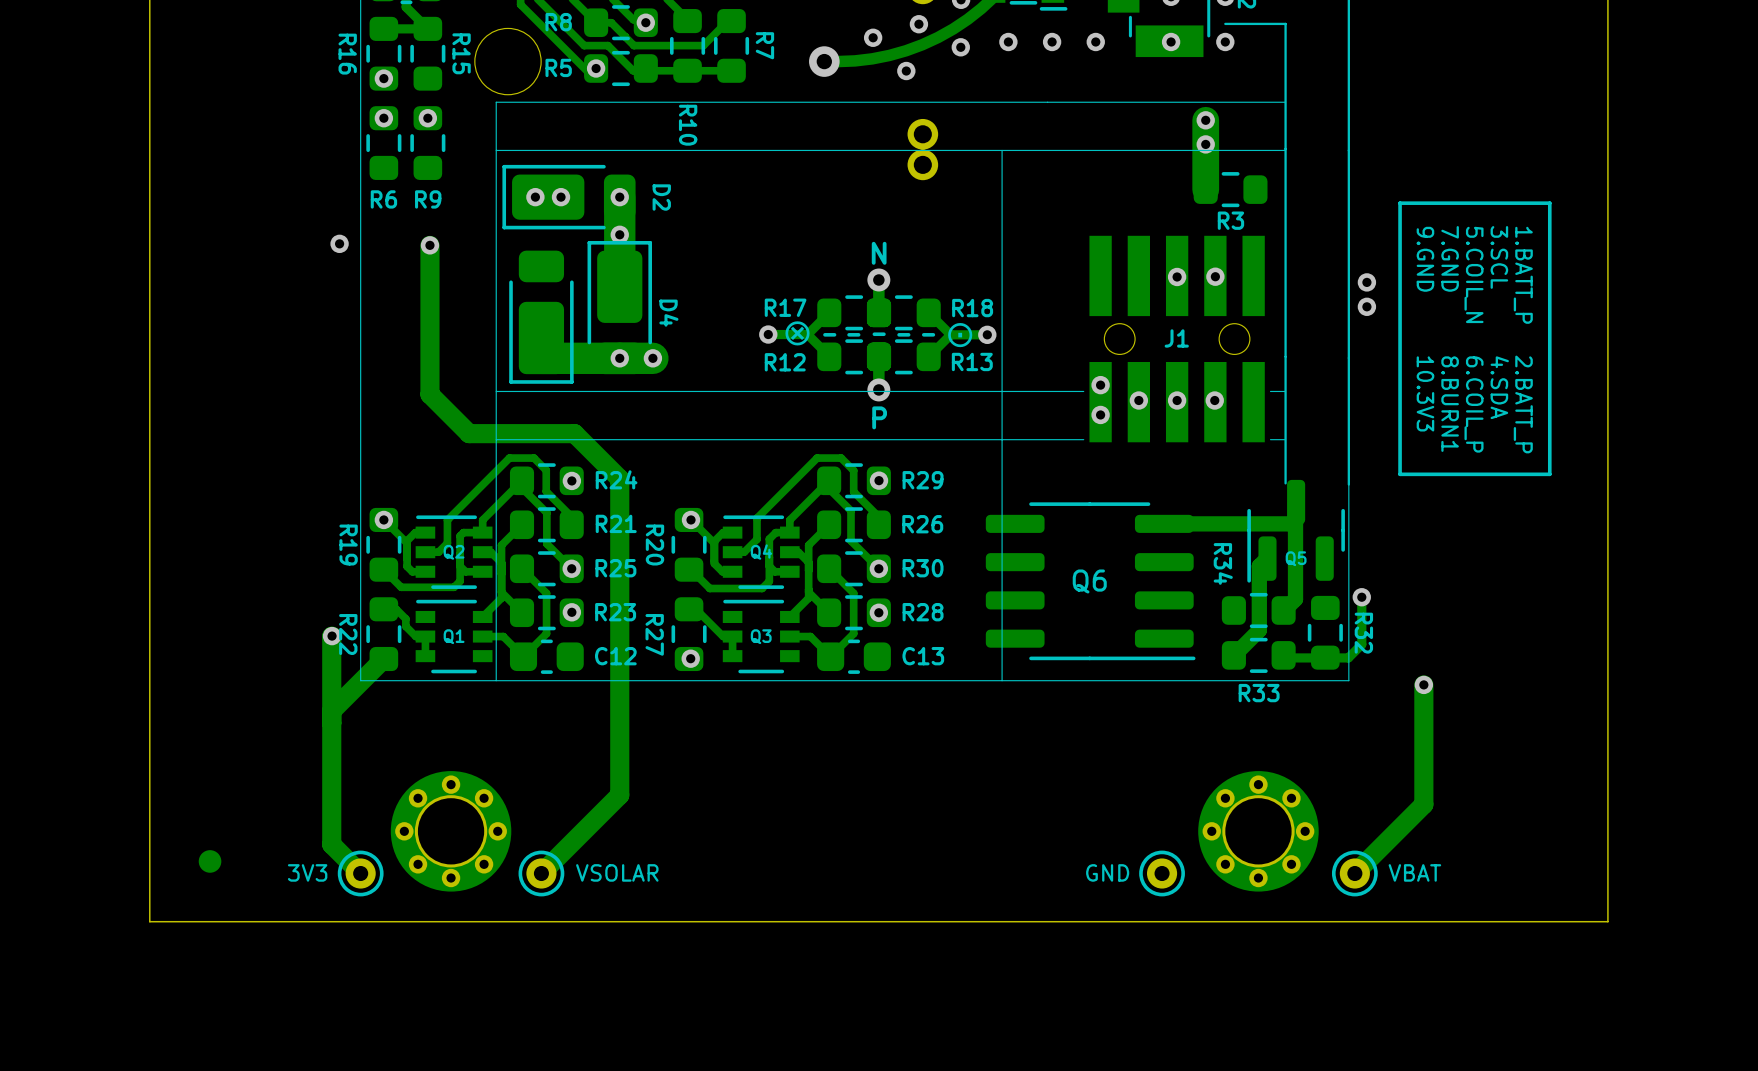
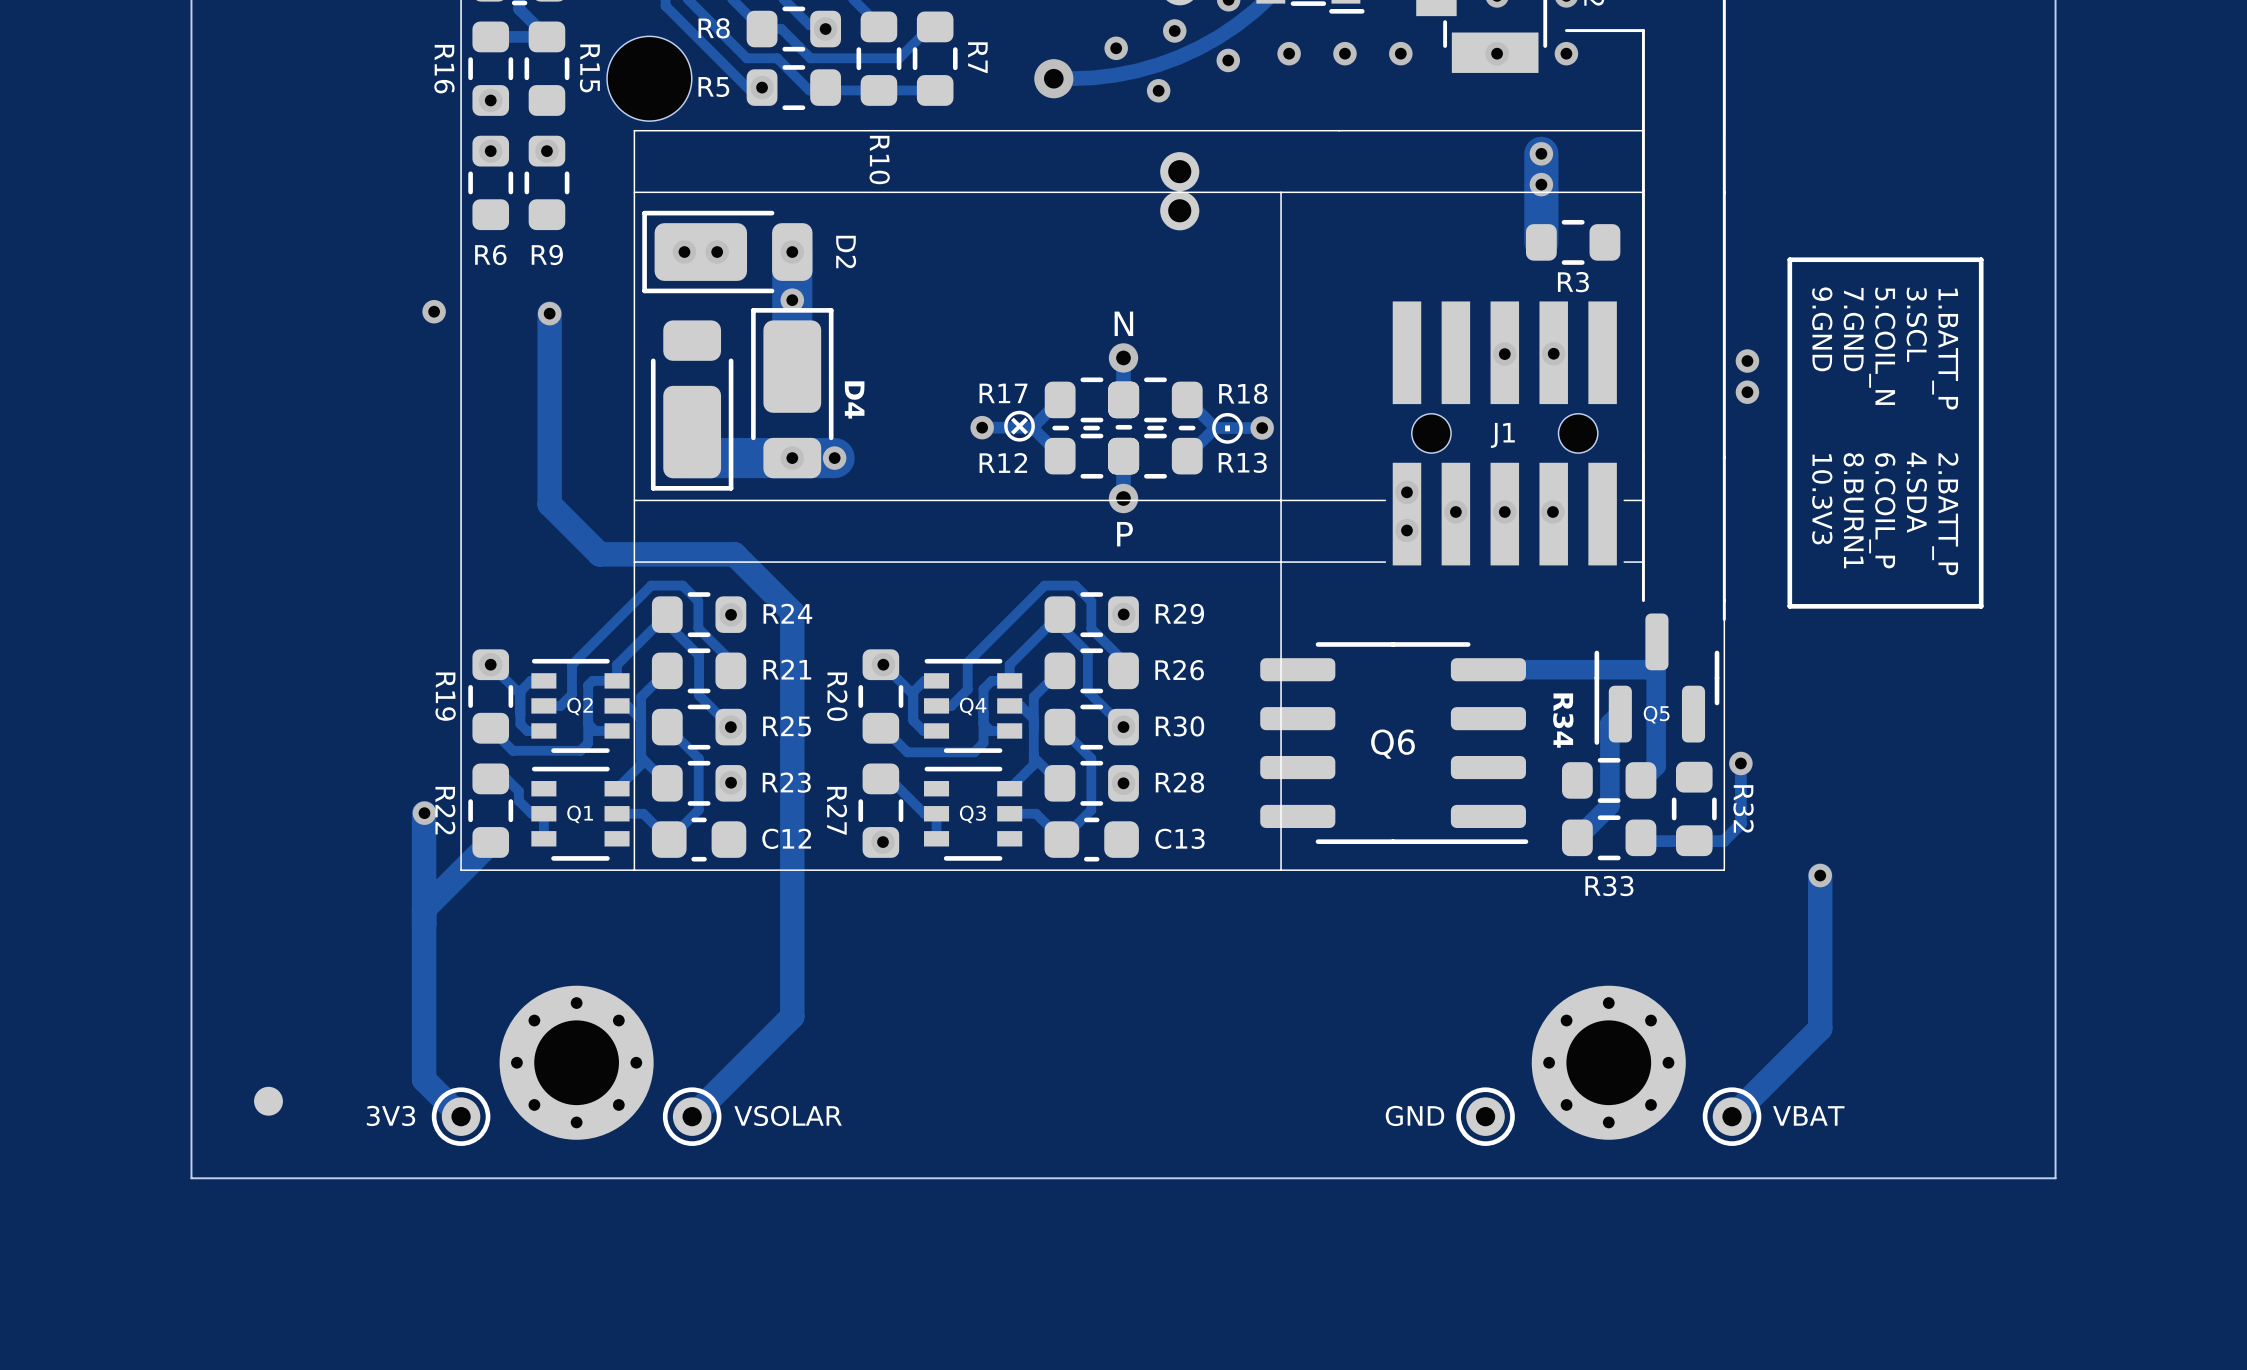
line: (1285, 469) (1285, 483) -> none

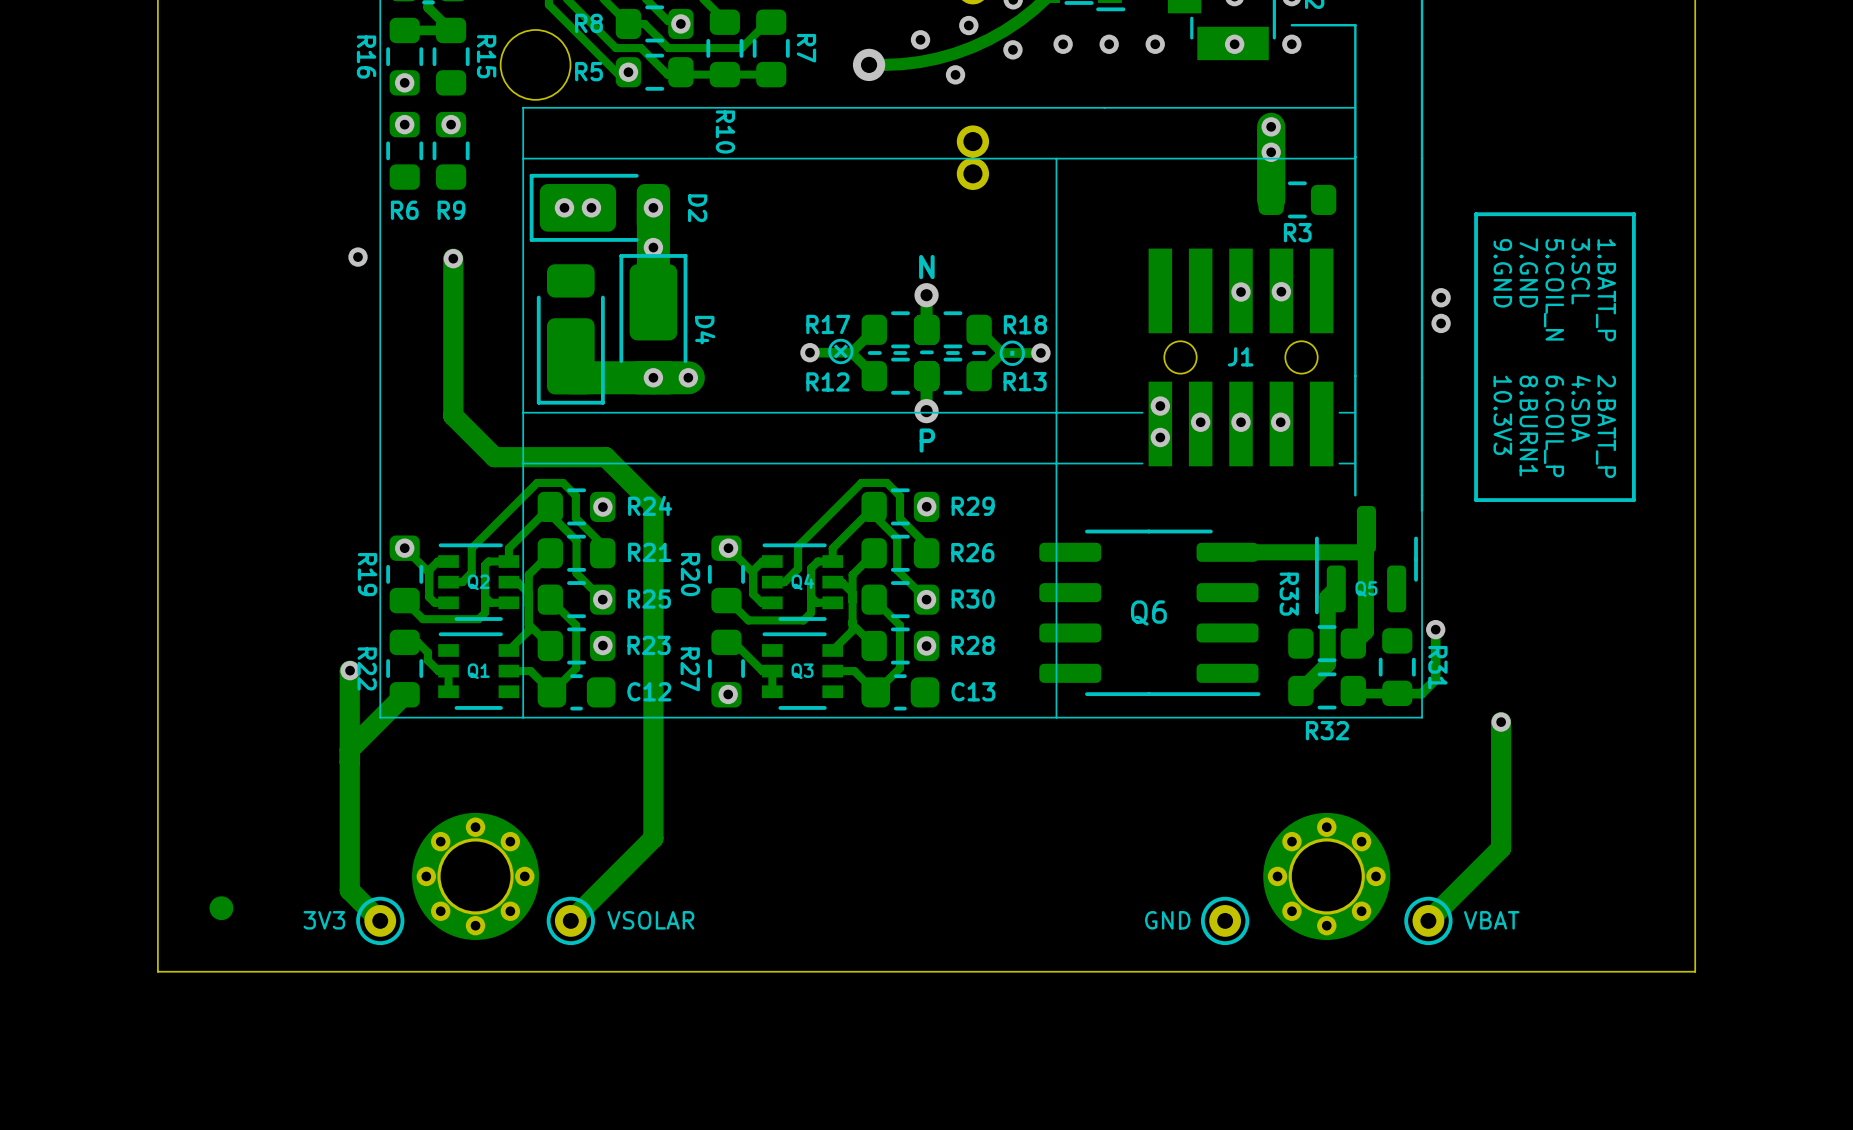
R34 name: R34 (1563, 720) -> R33 (1289, 594)
R32 name: R32 (1743, 808) -> R31 (1437, 667)
R33 name: R33 (1609, 886) -> R32 (1327, 730)

